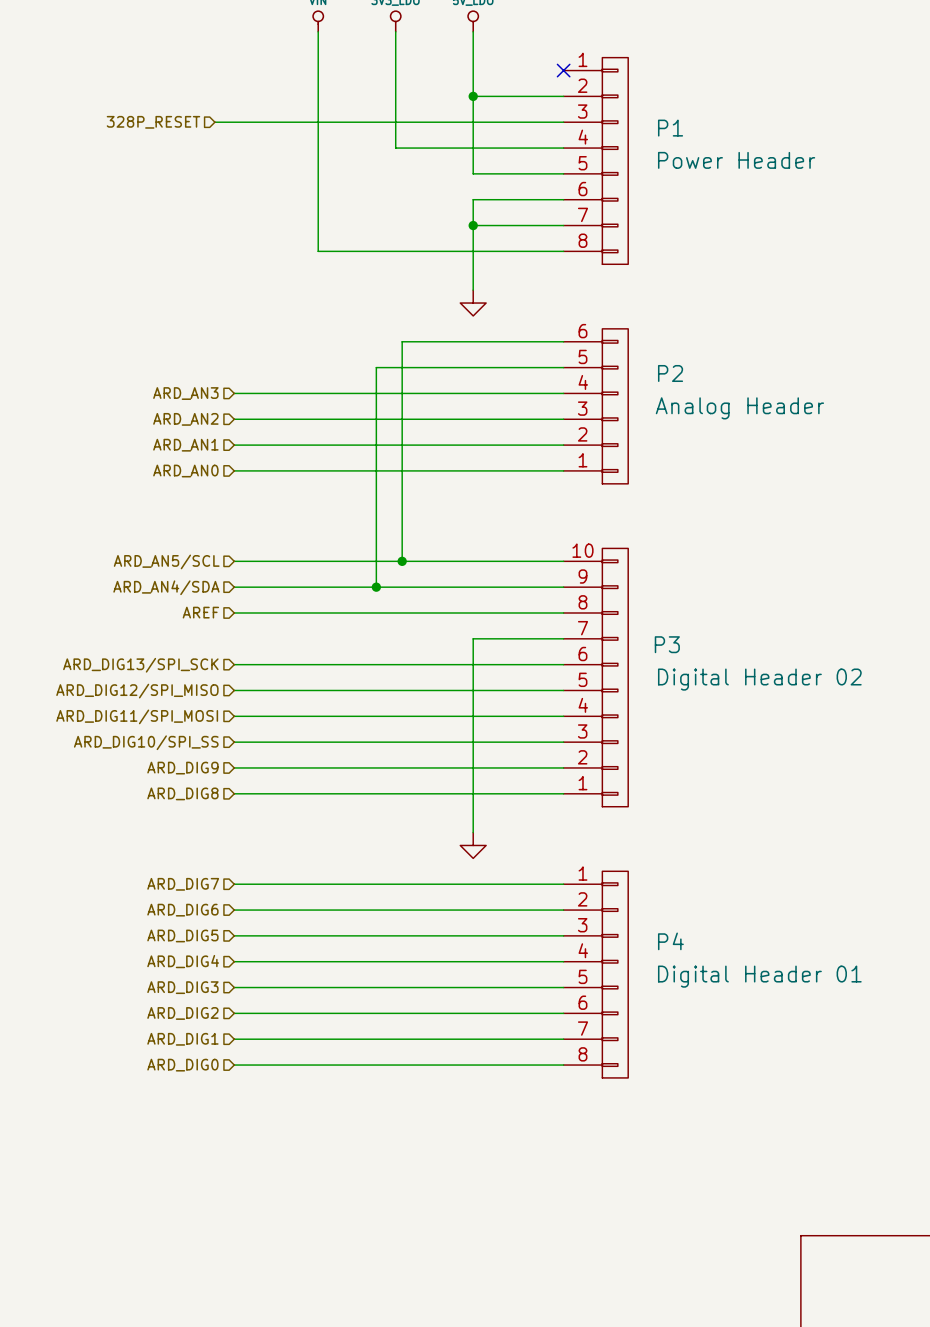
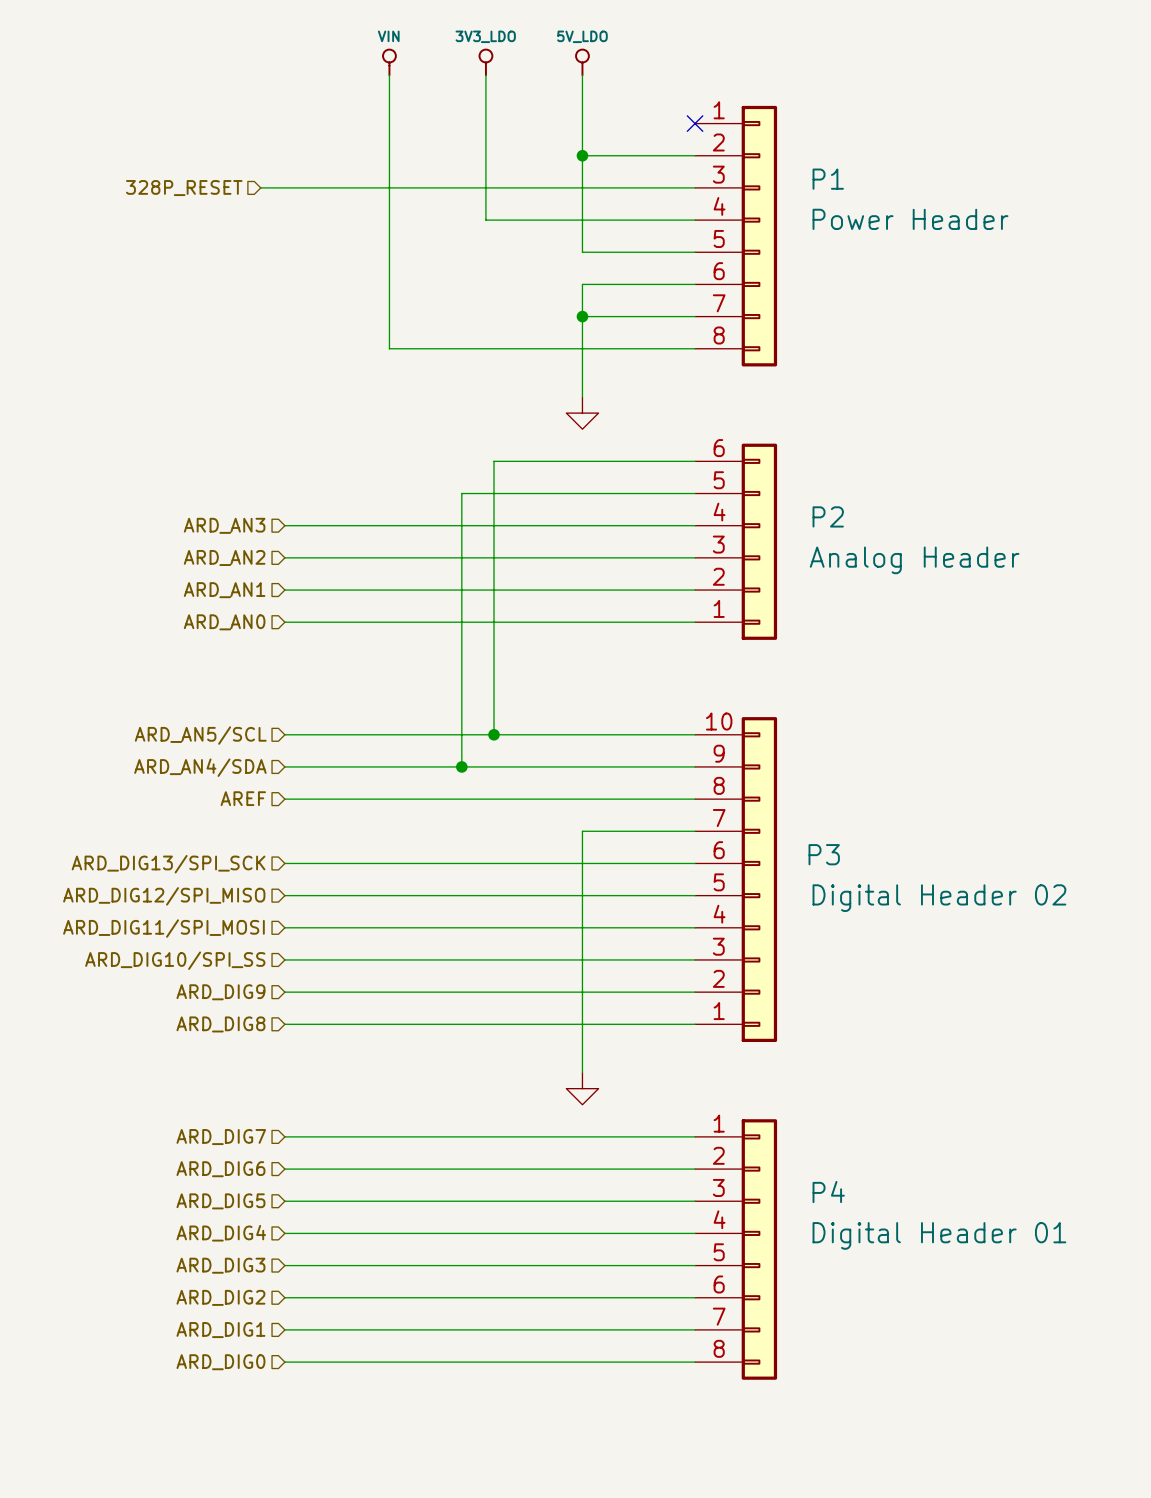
P1 symbol: [563, 57, 629, 265] -> [695, 105, 778, 367]
P2 symbol: [563, 328, 629, 484] -> [695, 443, 778, 640]
P3 symbol: [563, 548, 629, 807] -> [695, 717, 778, 1043]
P4 symbol: [563, 871, 629, 1078] -> [695, 1119, 778, 1380]

